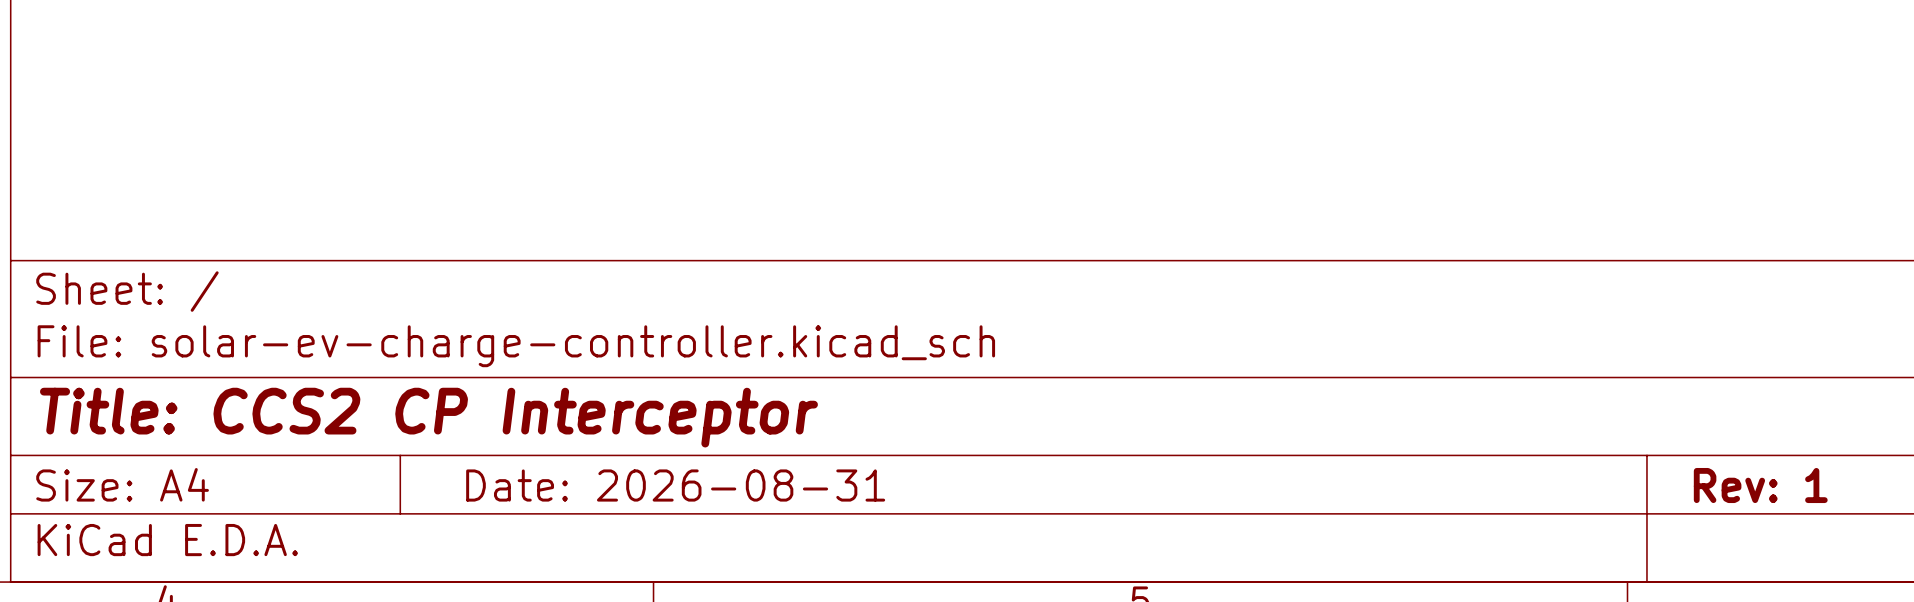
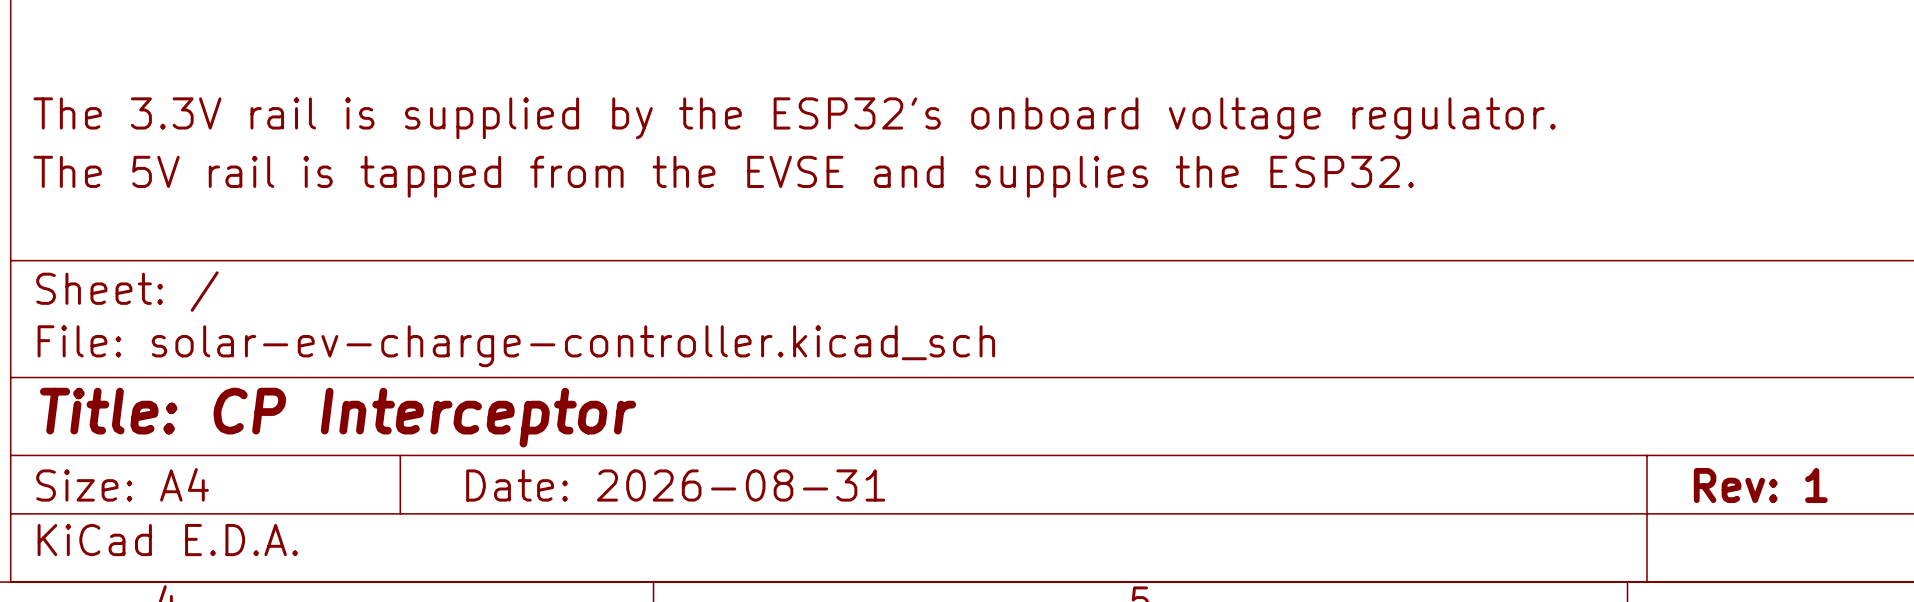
title block: none -> The 3.3V rail is supplied by the ESP32's onboard voltage regulator. (794, 118)
title block: none -> The 5V rail is tapped from the EVSE and supplies the ESP32. (723, 176)
title block: Title: CCS2 CP Interceptor (428, 417) -> Title: CP Interceptor (338, 417)

